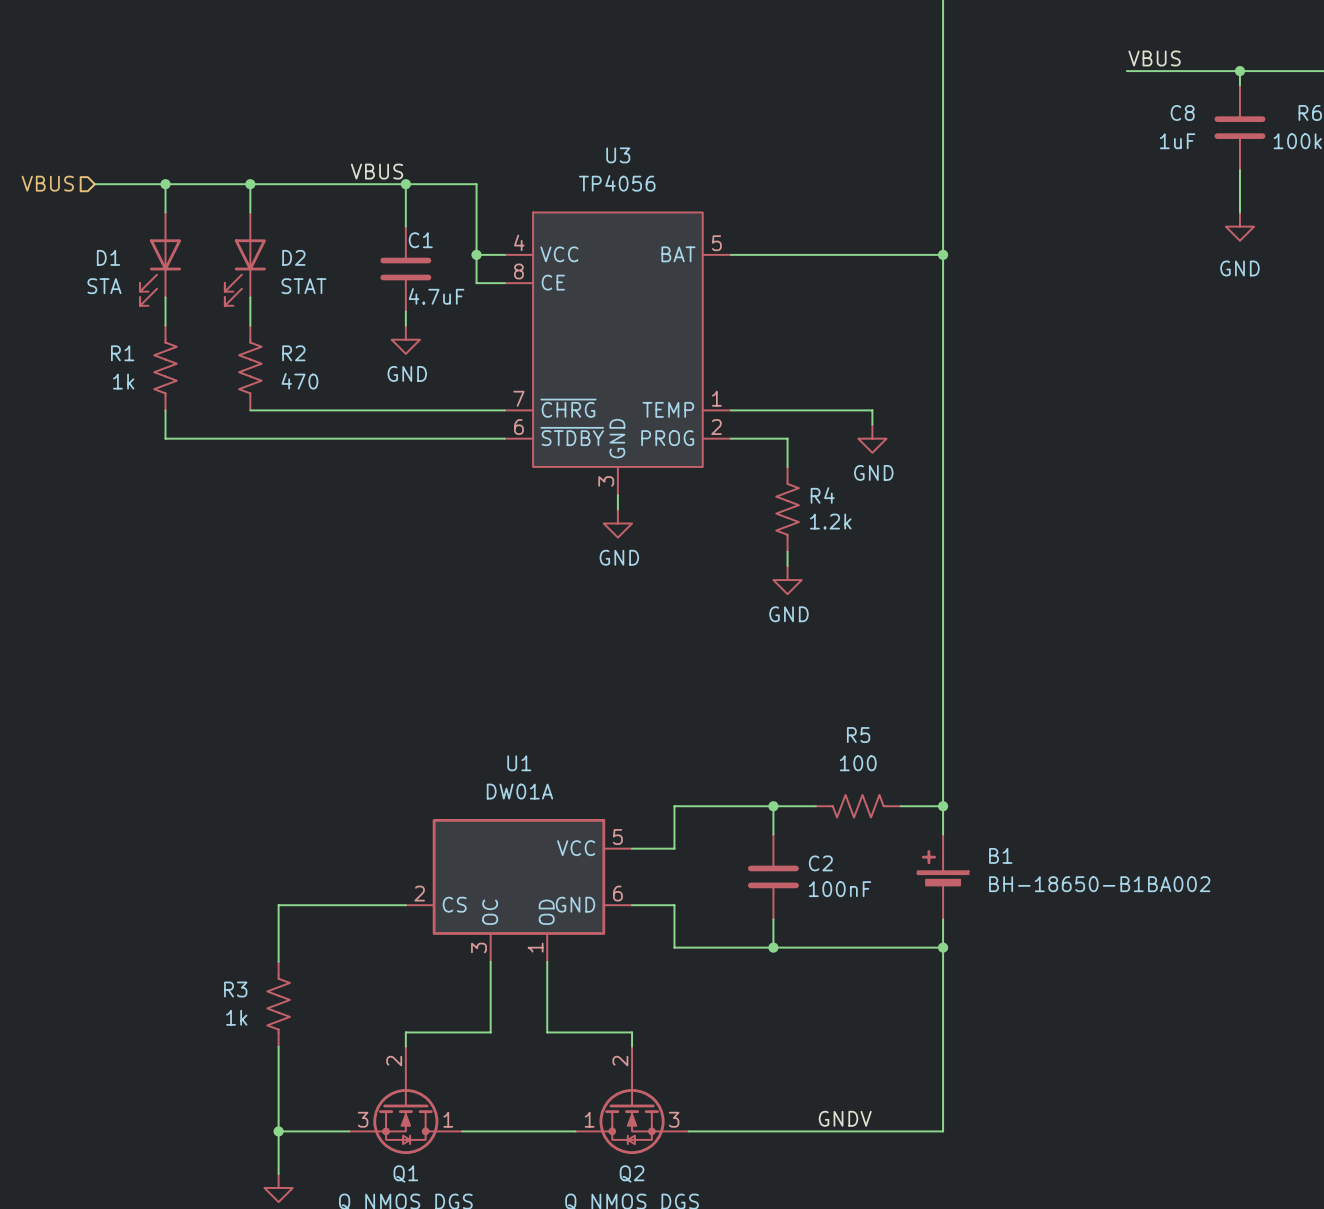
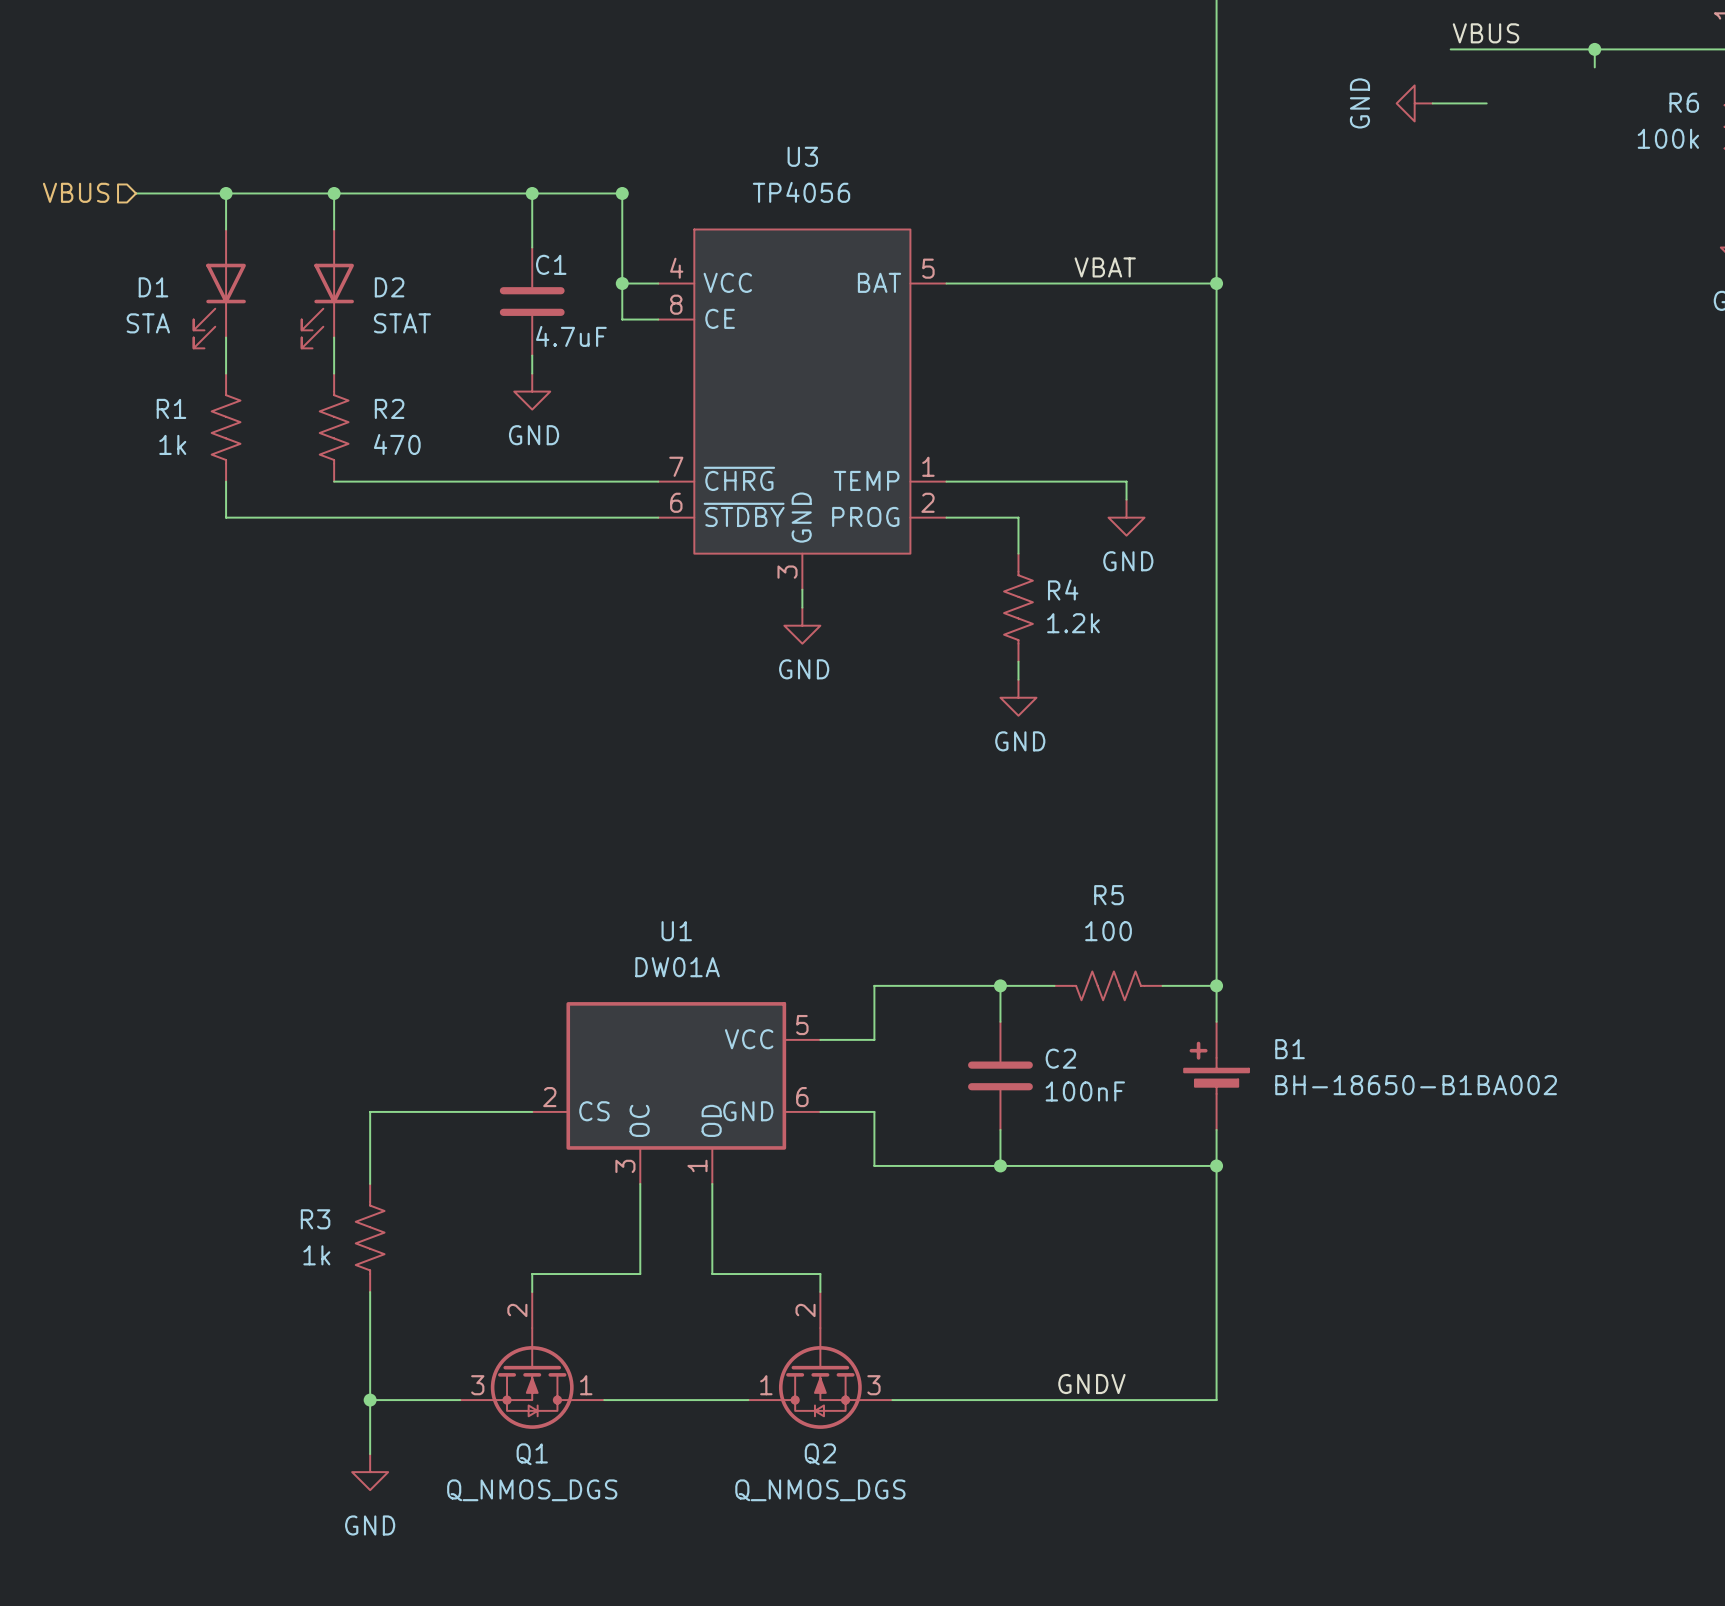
wire: none -> (1432, 103) (1486, 103)
C8: 1uF (1239, 127) -> none
wire: (1239, 170) (1239, 212) -> none
label: VBUS (377, 171) -> none
junction: none -> (622, 193)
power symbol rotation: 0° (1239, 226) -> 90° clockwise (1414, 103)
power symbol position: GND (1239, 226) -> GND (1414, 103)
label: none -> VBAT (1105, 267)

